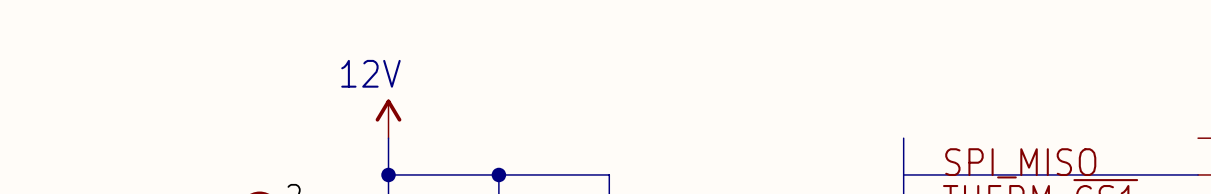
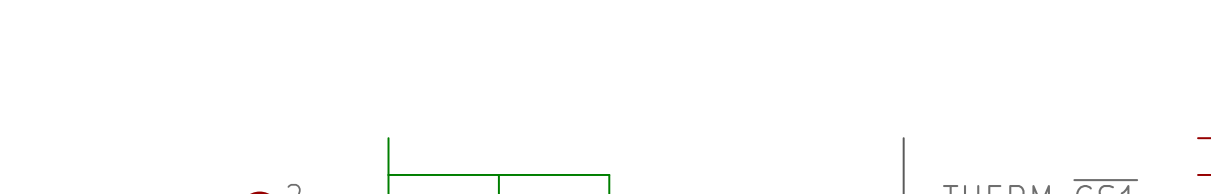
power symbol: 12V (388, 118) -> none
label: SPI_MISO (1020, 163) -> none
junction: (388, 174) -> none
junction: (498, 174) -> none
wire: (903, 174) (1198, 174) -> none

